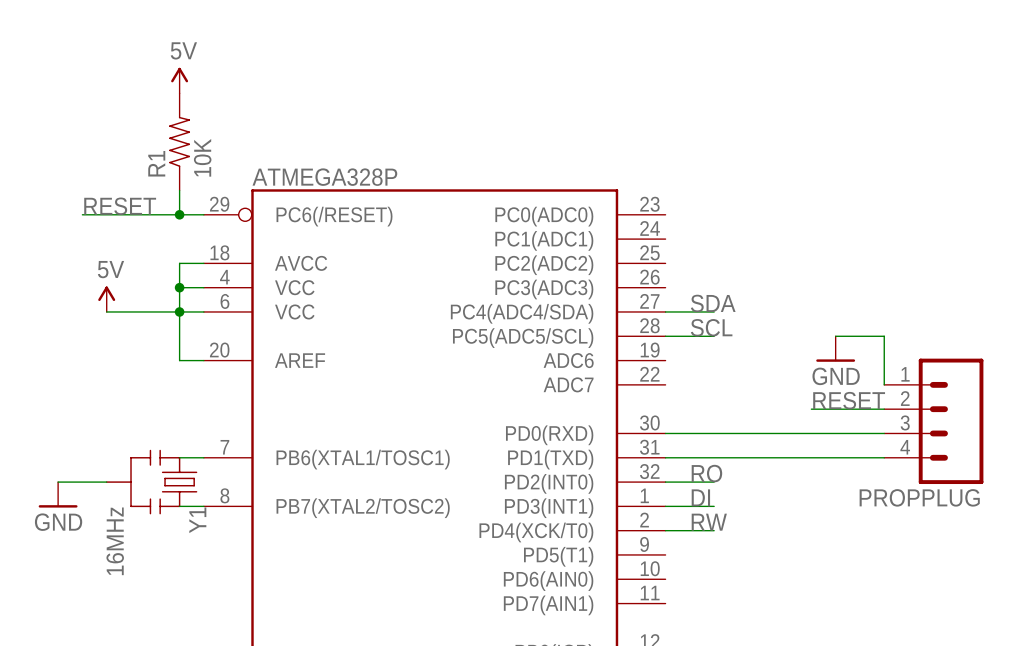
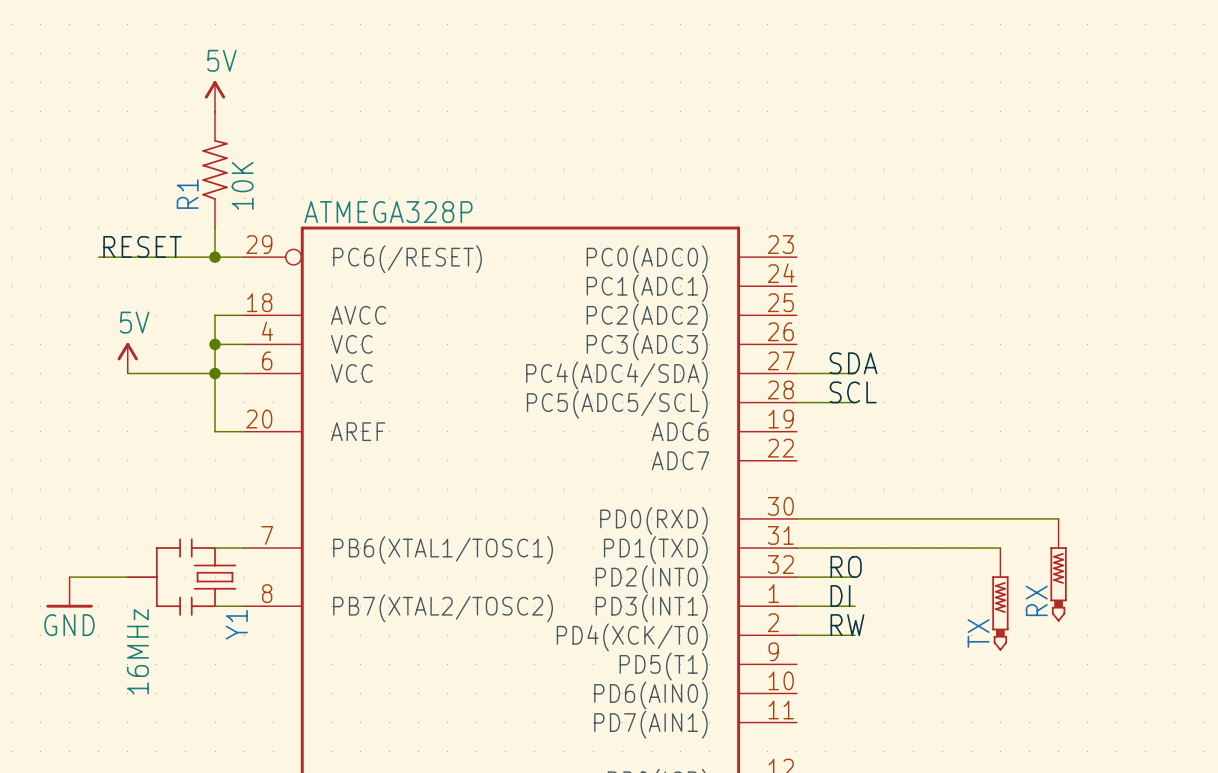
wire: (835, 336) (884, 336) (884, 384) -> none
power symbol: GND (835, 349) -> none
label: RESET (849, 400) -> none
wire: (811, 409) (884, 409) -> none
PROPPLUG: (933, 421) -> none
wire: (835, 457) (884, 457) -> none
RX: none -> (1058, 570)
TX: none -> (1000, 599)

